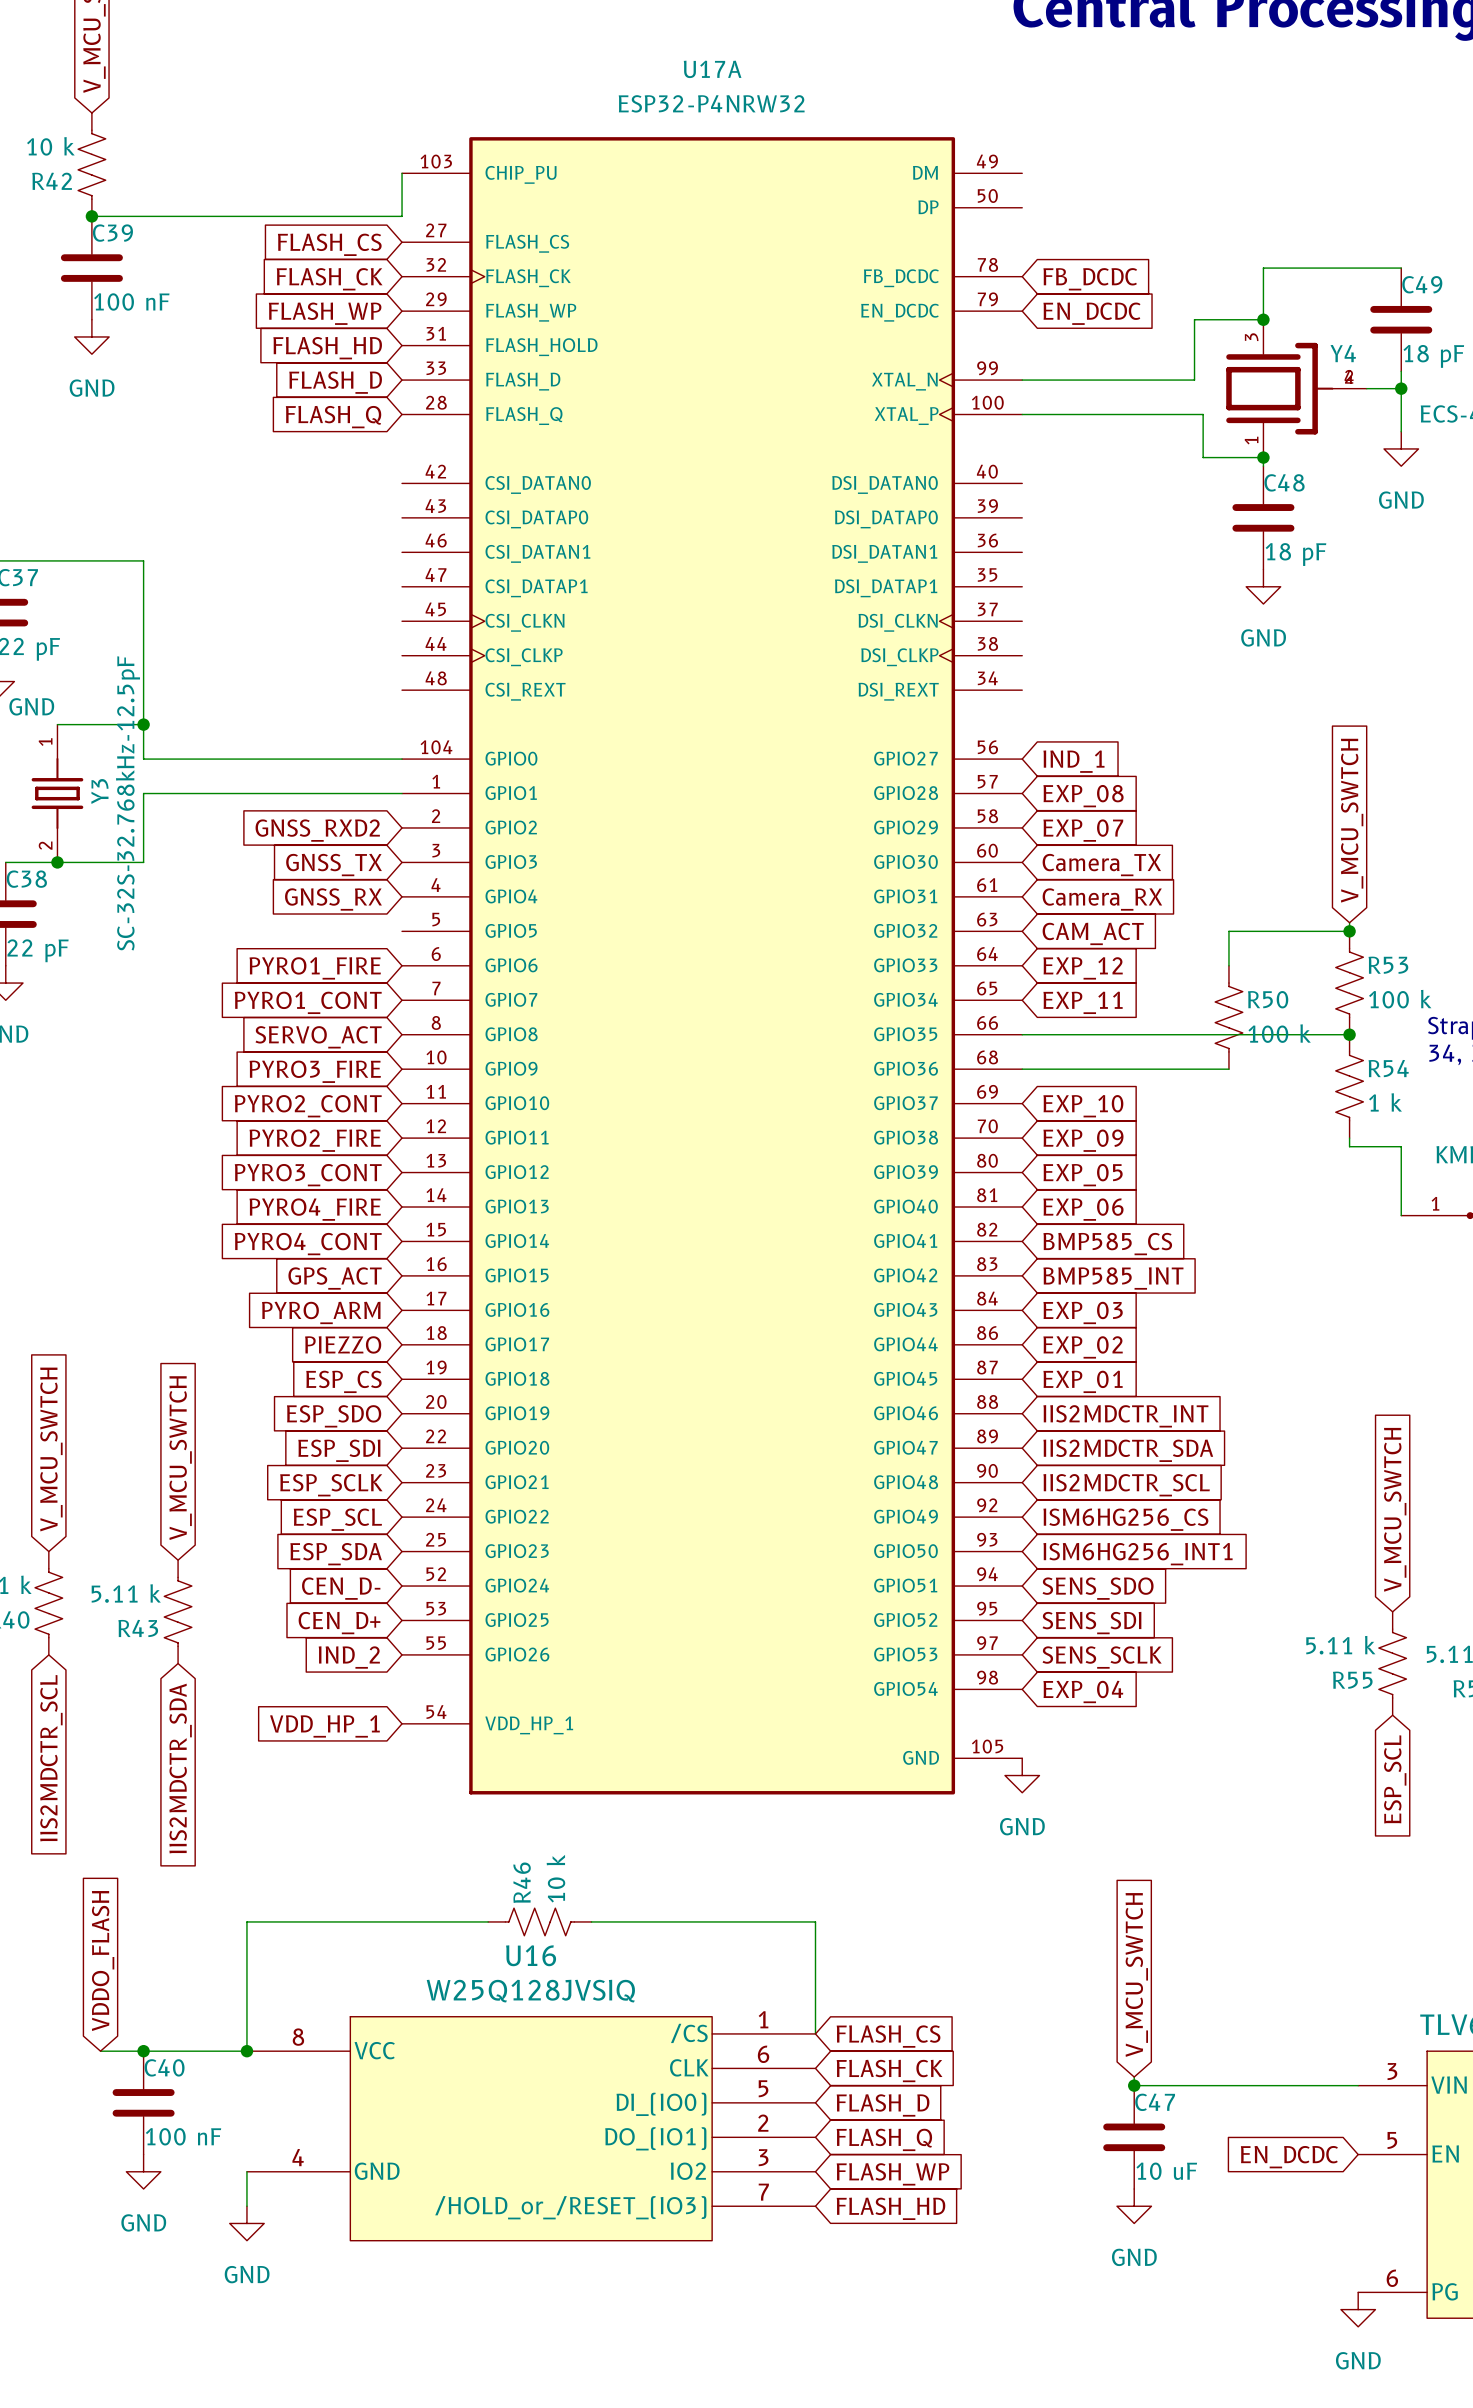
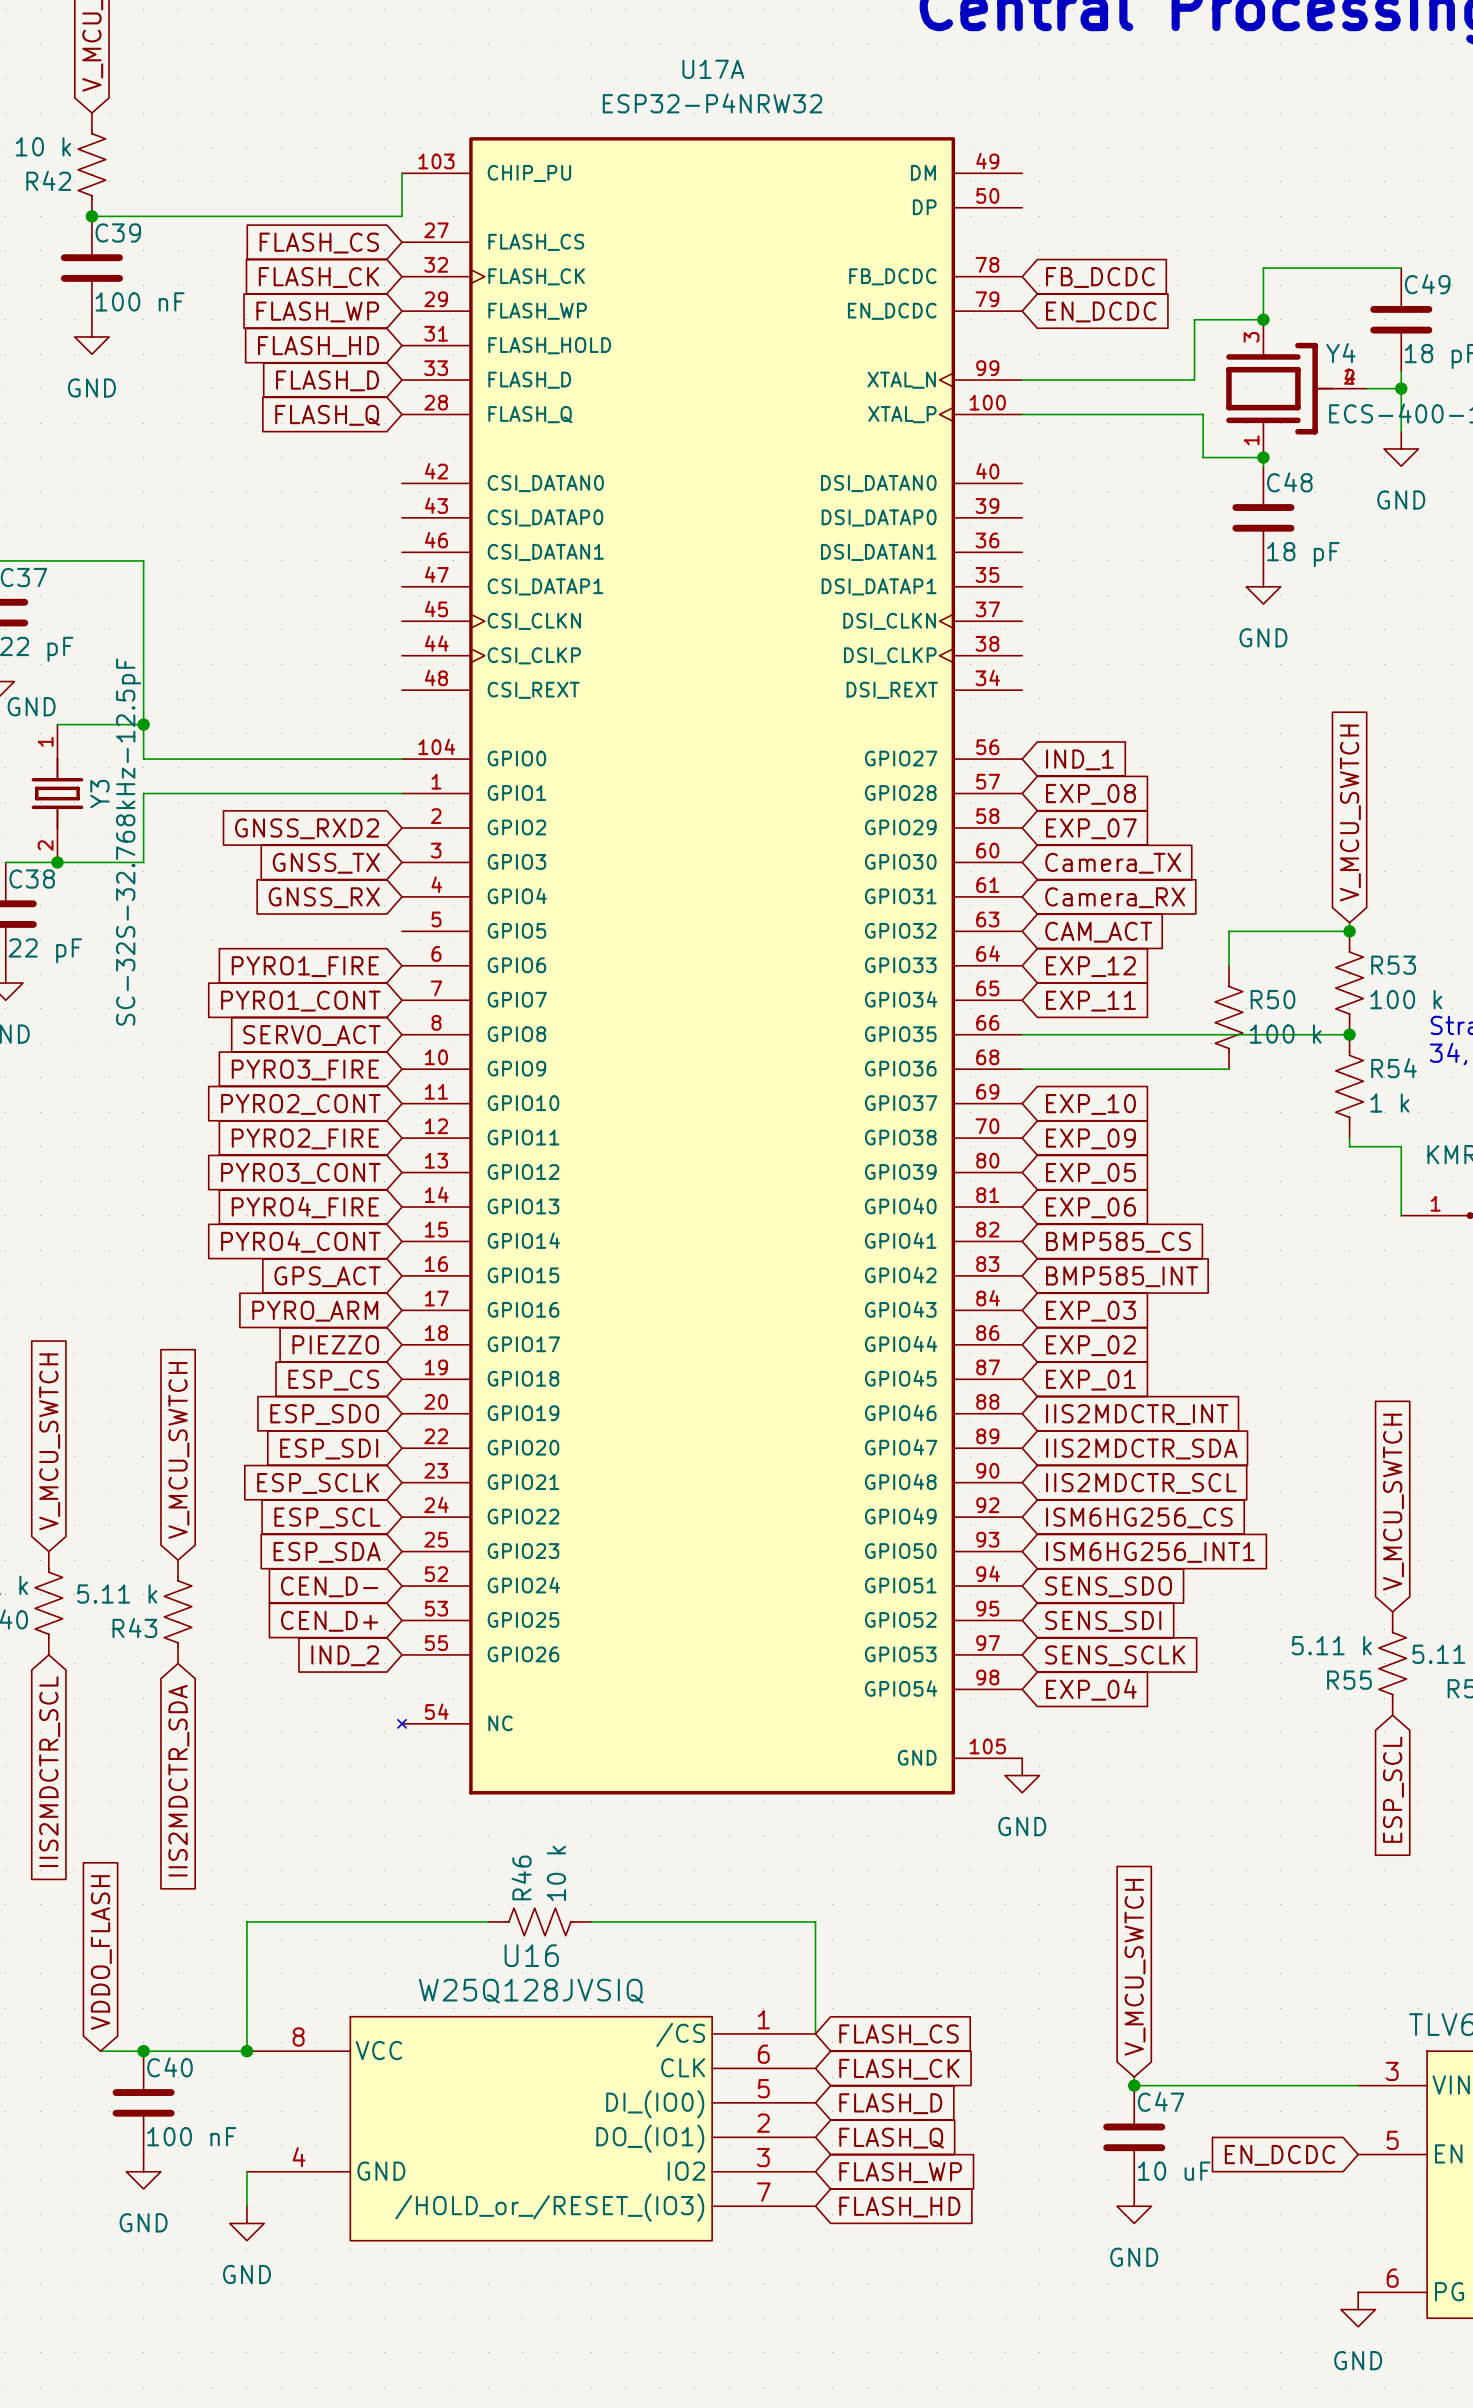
U17A symbol: [402, 137, 1023, 1795] -> [397, 137, 1023, 1795]
global label: VDD_HP_1 (324, 1726) -> none

